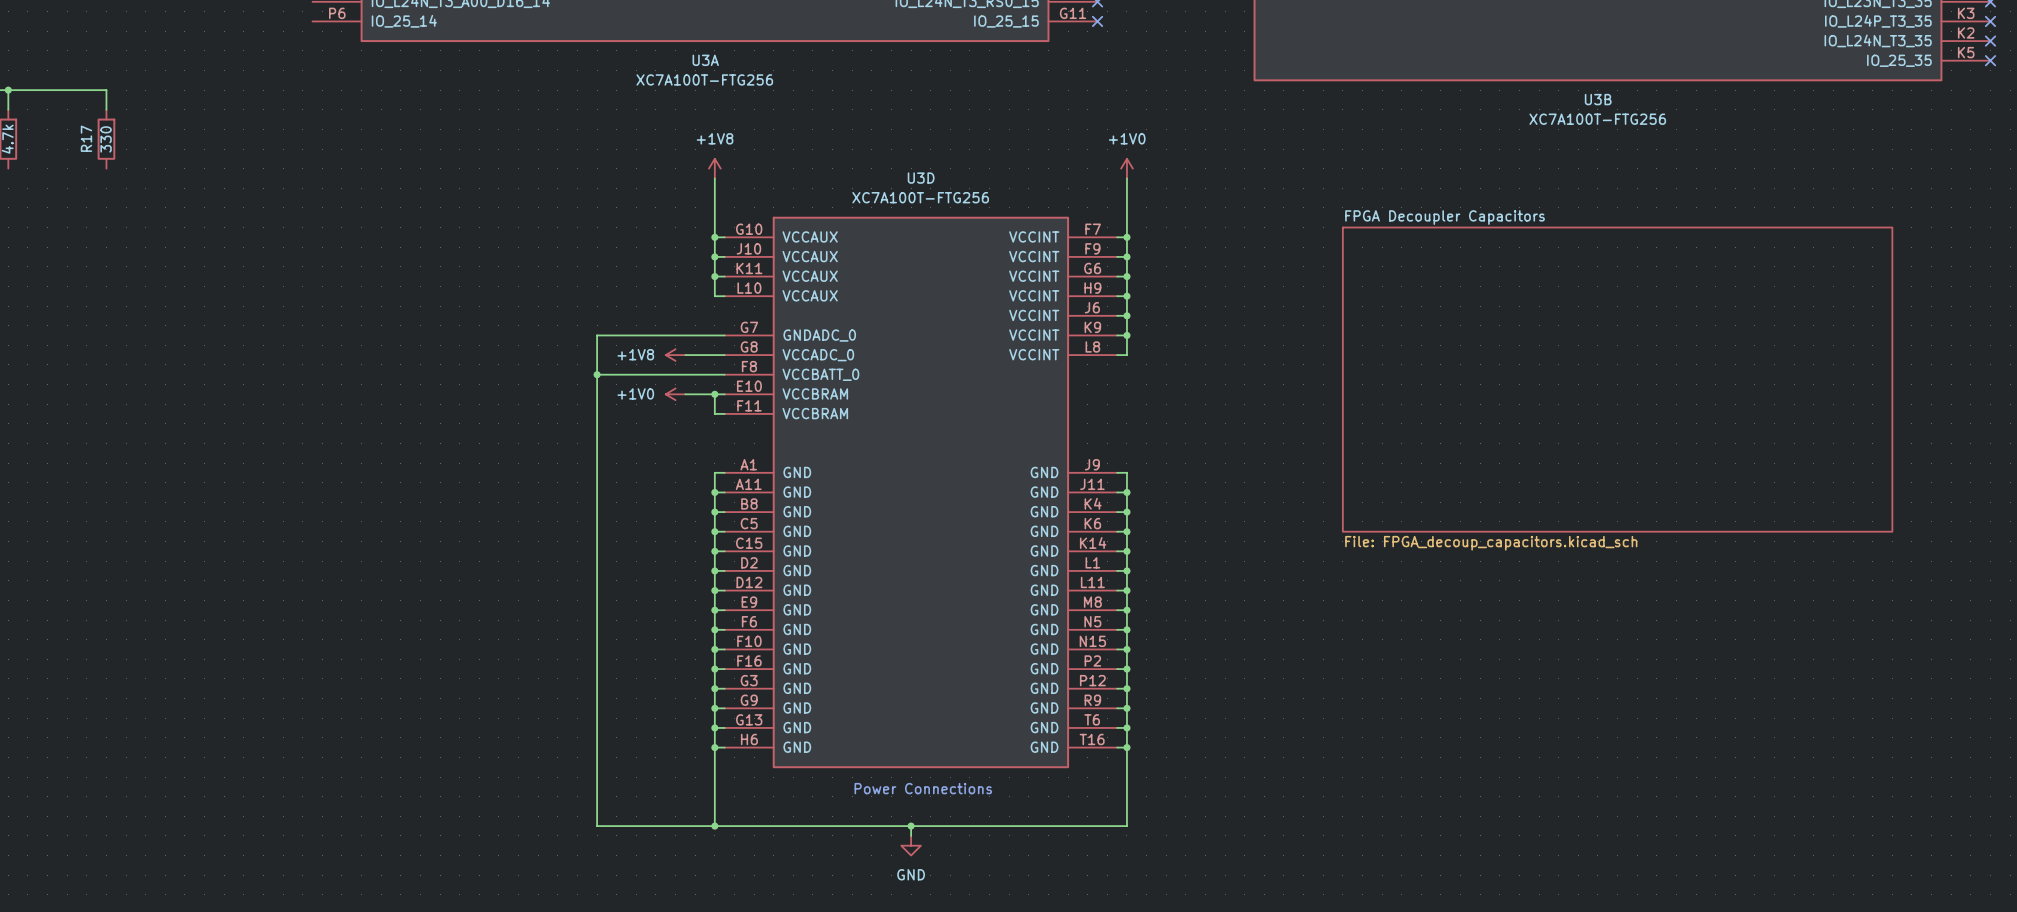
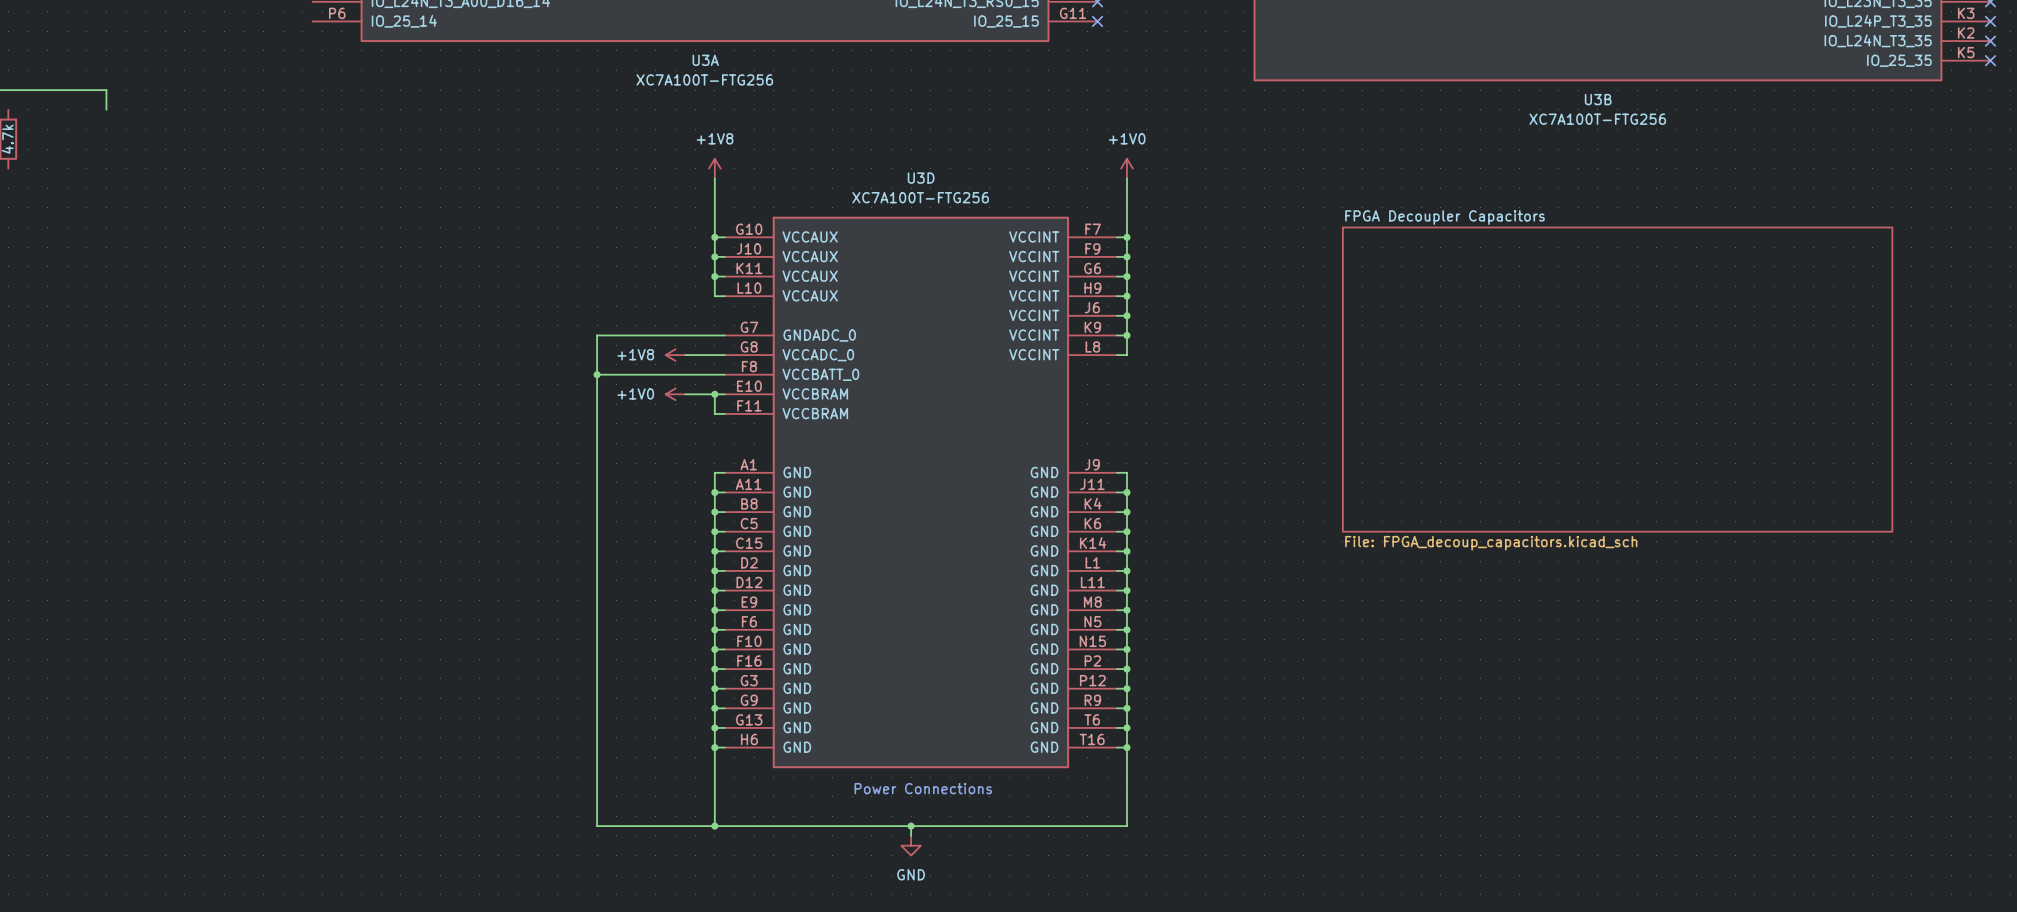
wire: (8, 90) (8, 109) -> none
junction: (8, 90) -> none
R17: 330 (106, 139) -> none

